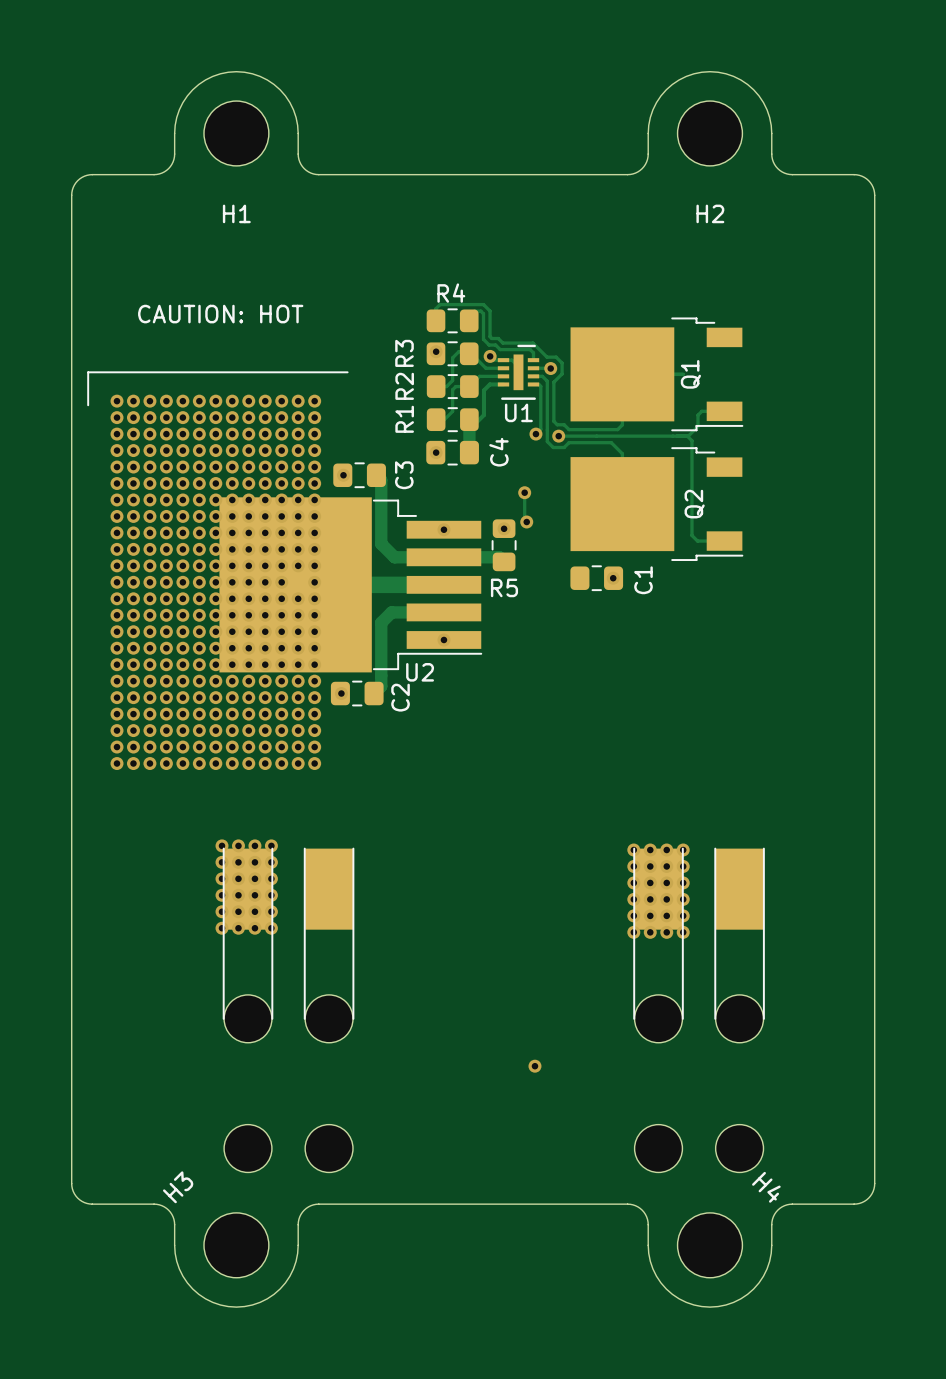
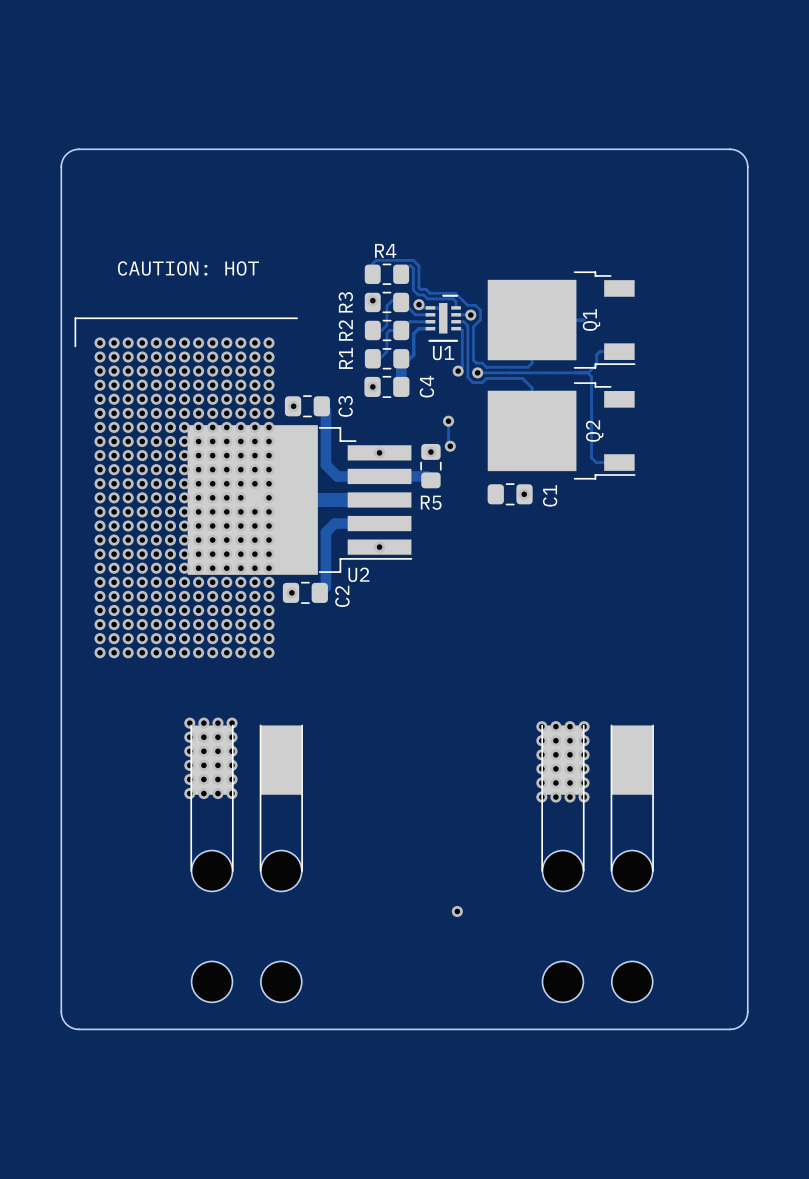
H1: (236, 133) -> none
H2: (709, 133) -> none
board edge: (154, 174) (164, 171) (173, 161) (176, 117) (187, 95) (205, 79) (220, 73) (236, 71) (252, 73) (267, 79) (285, 95) (296, 117) (299, 161) (308, 171) (318, 174) -> (131, 149) (272, 149)
board edge: (627, 174) (637, 171) (646, 161) (650, 117) (660, 95) (679, 79) (694, 73) (709, 71) (725, 73) (740, 79) (758, 95) (769, 117) (773, 161) (782, 171) (792, 174) -> (536, 149) (677, 149)
board edge: (154, 1204) (164, 1206) (173, 1216) (176, 1261) (187, 1282) (205, 1298) (220, 1304) (236, 1307) (252, 1304) (267, 1298) (285, 1282) (296, 1261) (299, 1216) (308, 1206) (318, 1204) -> (131, 1029) (272, 1029)
board edge: (627, 1204) (637, 1206) (646, 1216) (650, 1261) (660, 1282) (679, 1298) (694, 1304) (709, 1307) (725, 1304) (740, 1298) (758, 1282) (769, 1261) (773, 1216) (782, 1206) (792, 1204) -> (536, 1029) (677, 1029)
H3: (236, 1245) -> none
H4: (709, 1245) -> none

